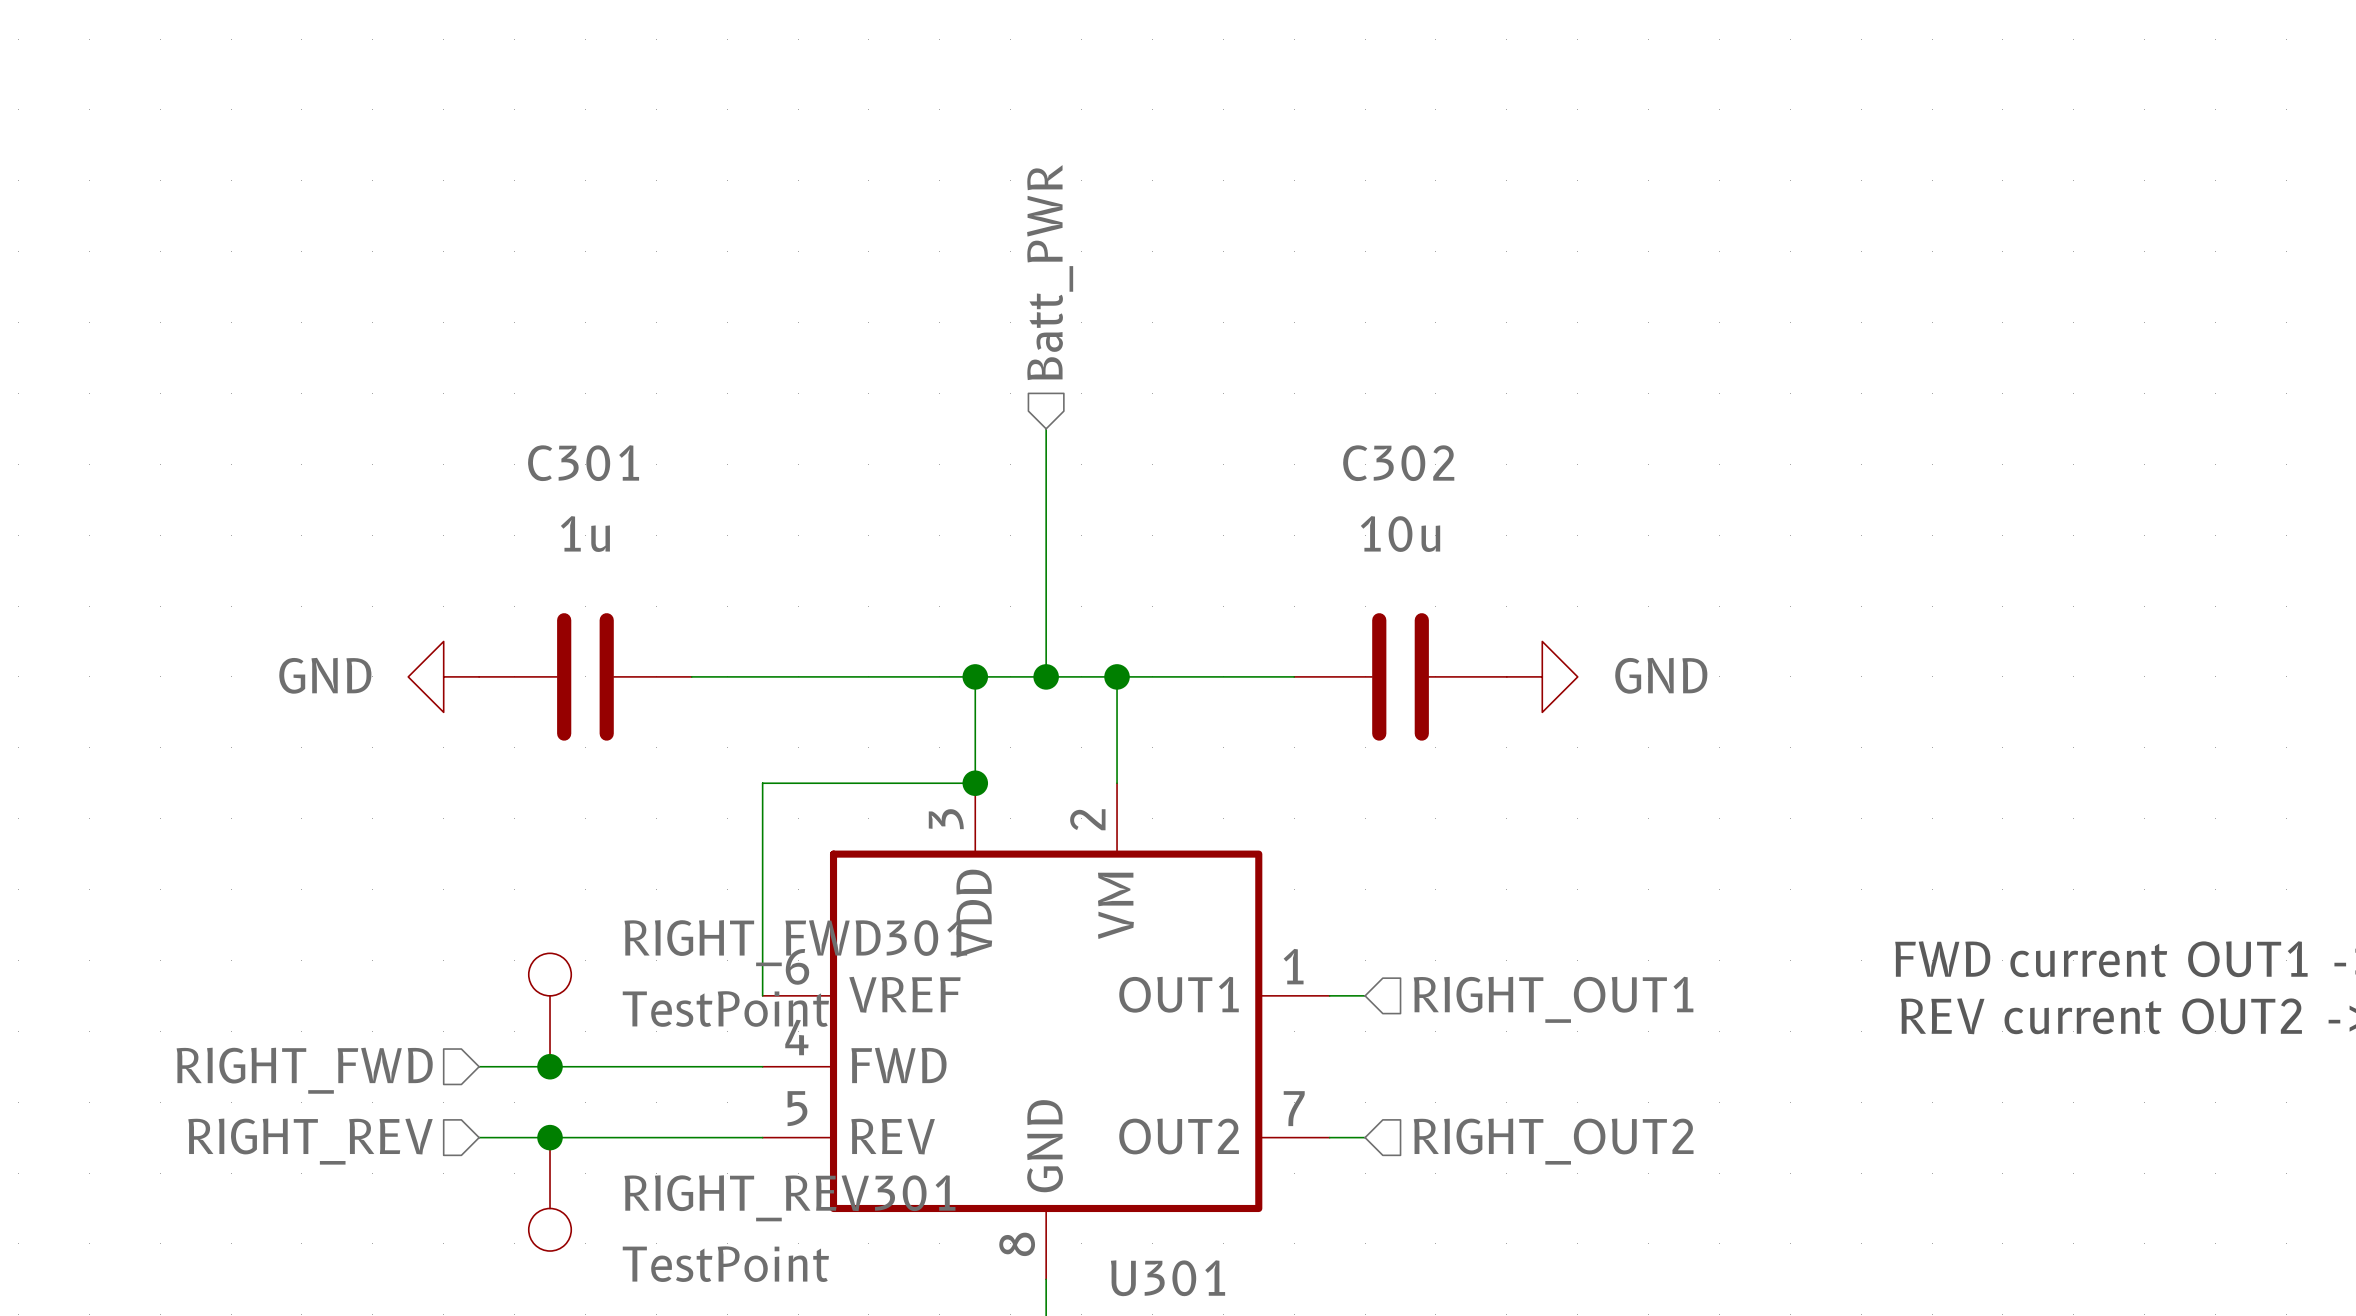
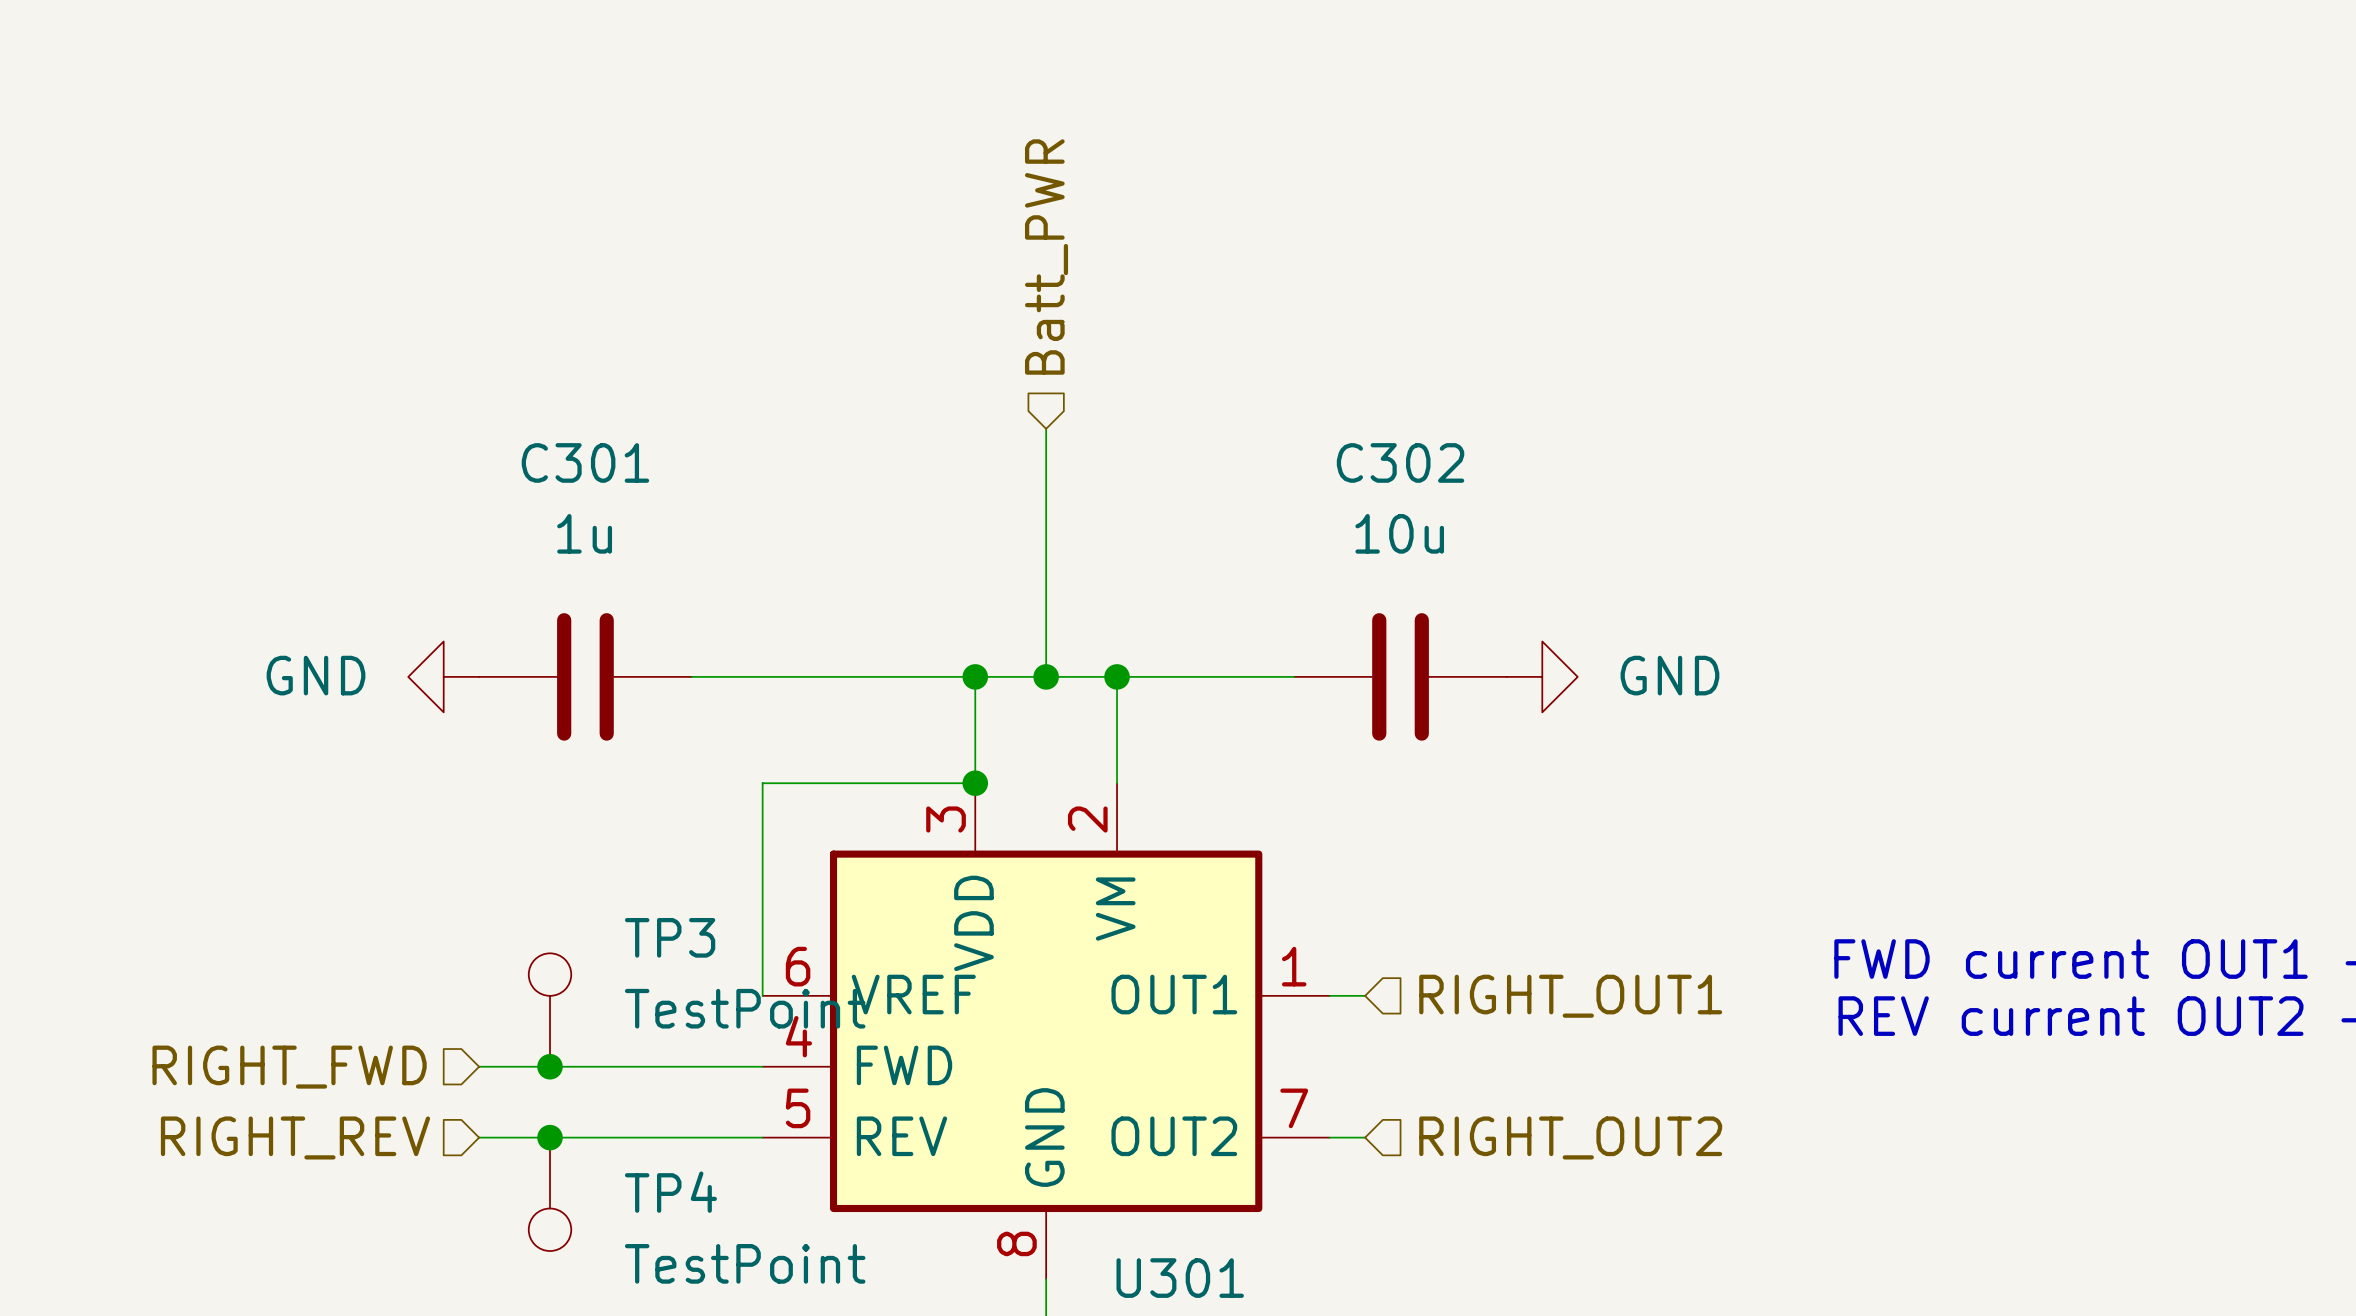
RIGHT_FWD301 name: RIGHT_FWD301 (795, 943) -> TP3 (670, 937)
RIGHT_REV301 name: RIGHT_REV301 (789, 1198) -> TP4 (670, 1192)

